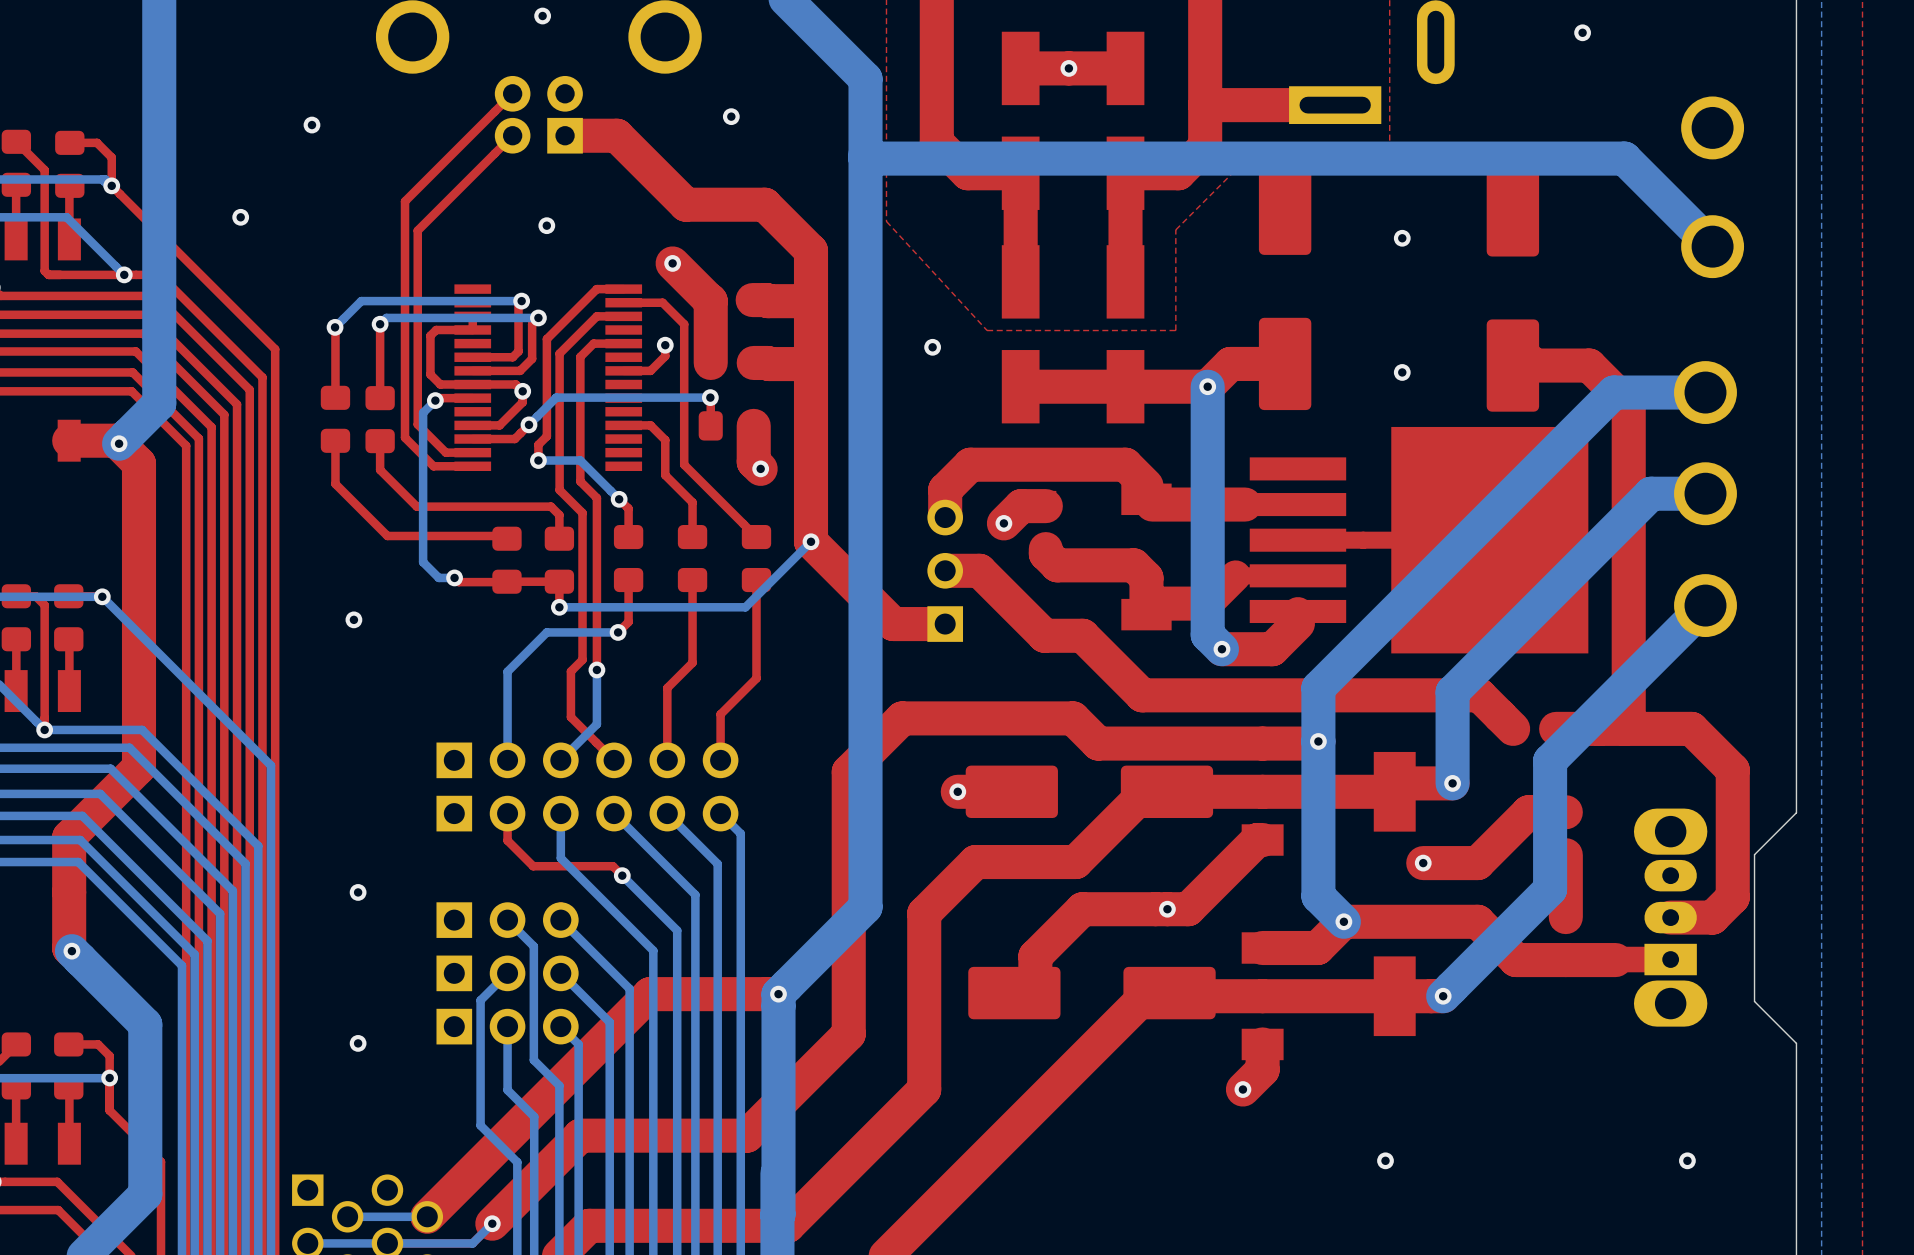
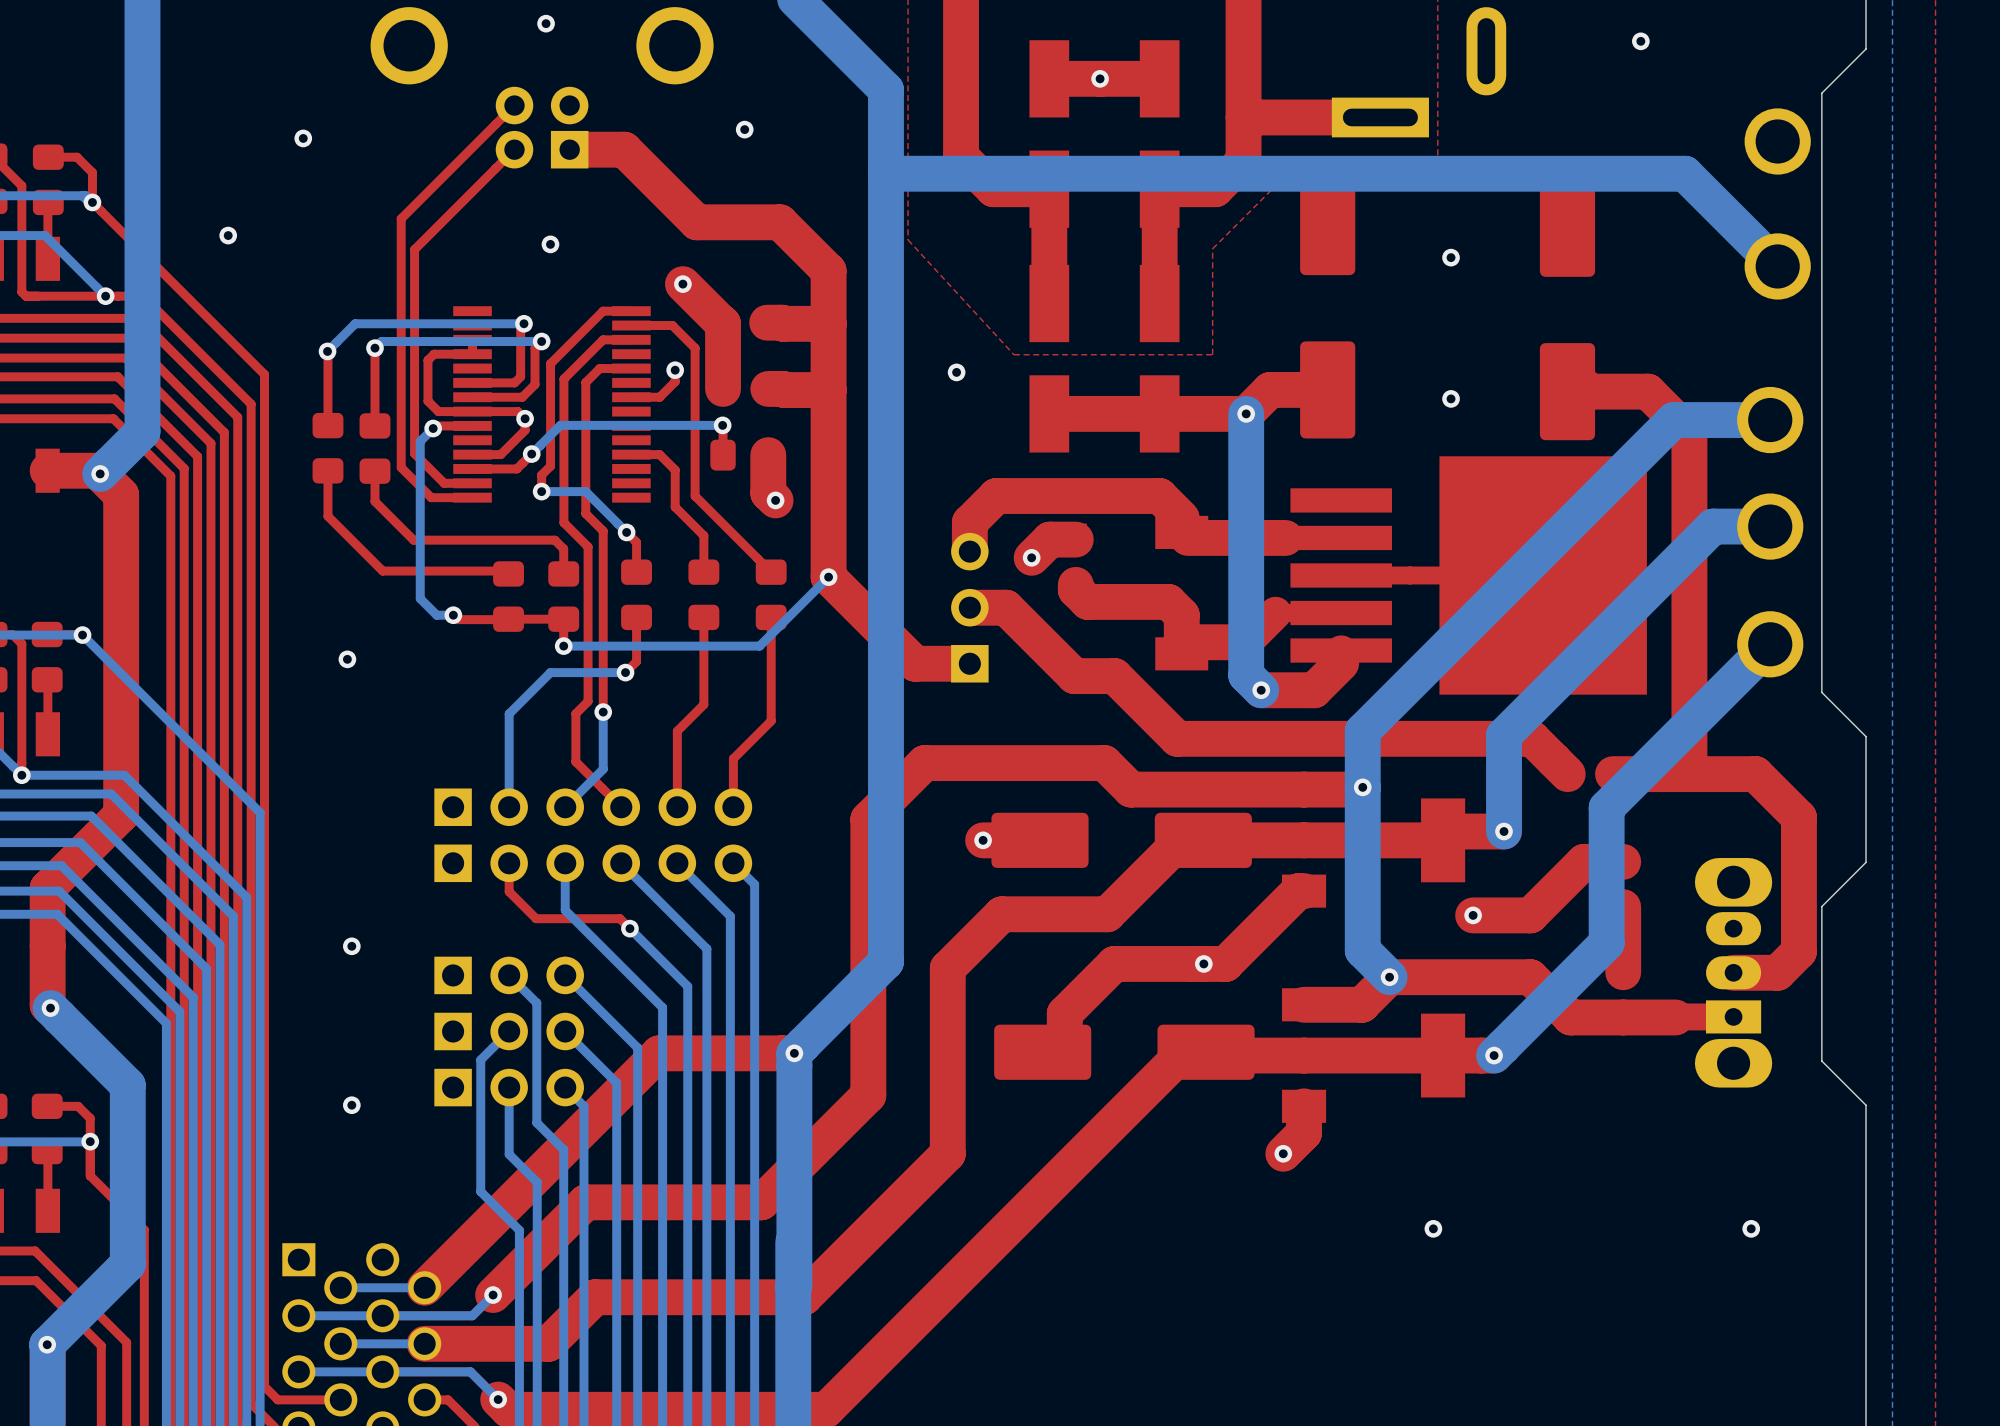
board edge: (1796, 40) (1796, 693) -> (1866, 49) (1821, 93) (1821, 692) (1866, 736)

